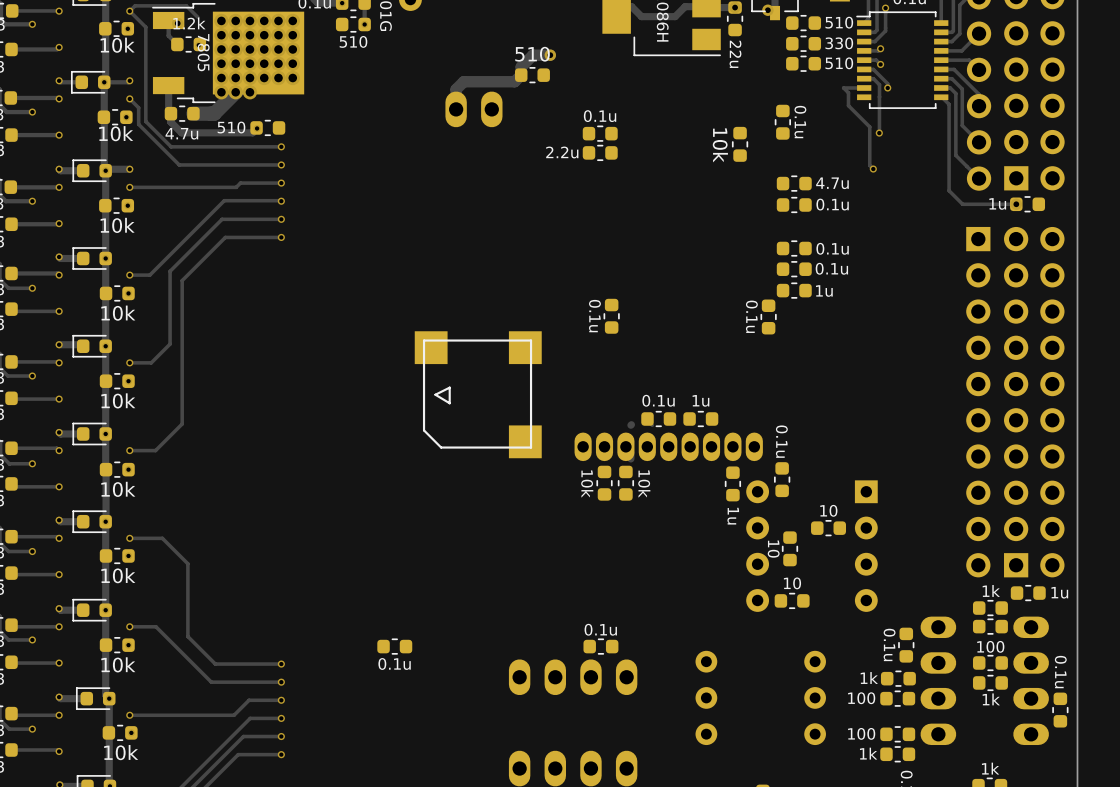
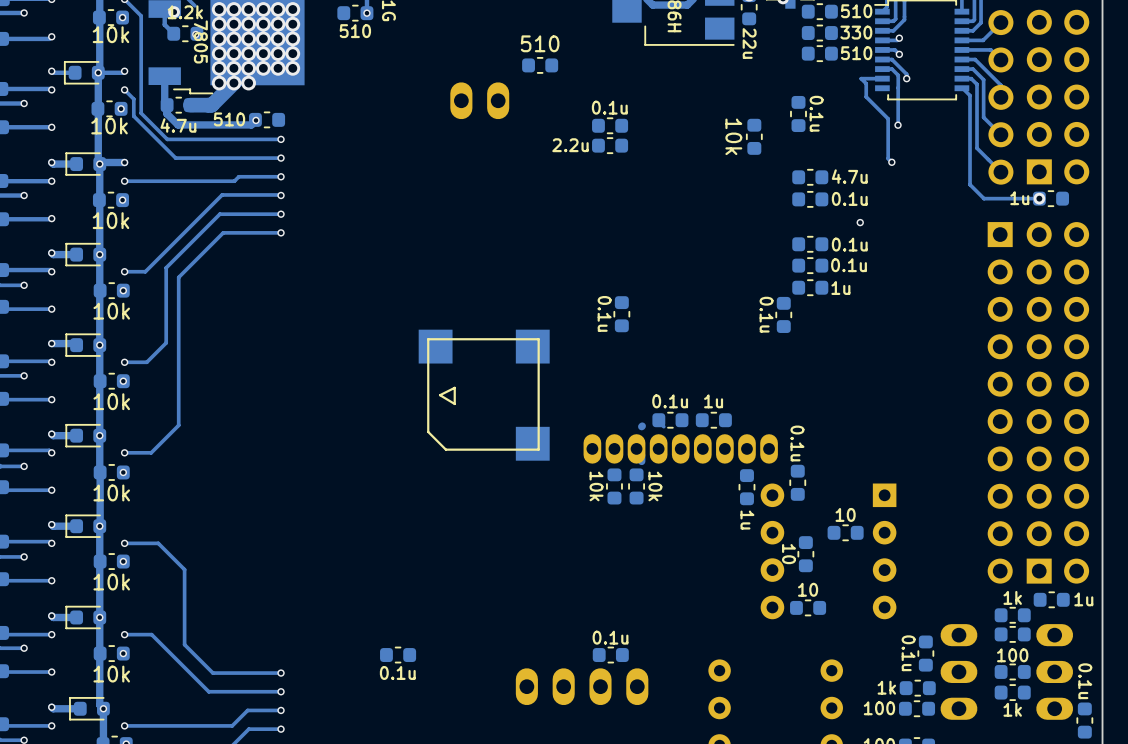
track: (550, 55) (533, 55) (521, 66) (521, 75) (514, 81) (463, 81) (456, 89) (456, 109) -> none
via: (550, 55) -> none
via: none -> (860, 222)

